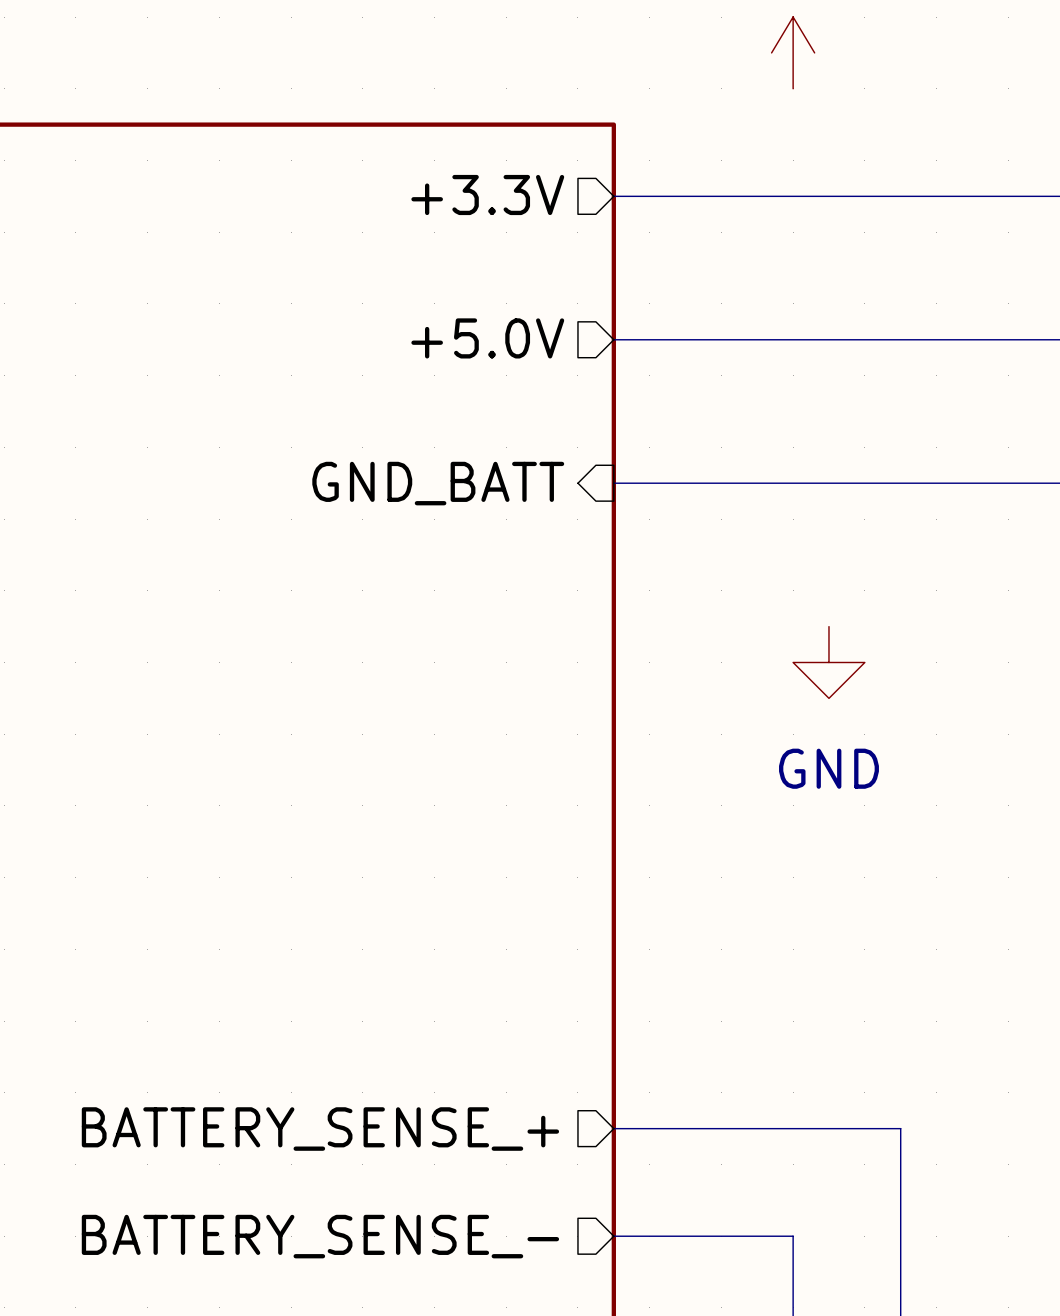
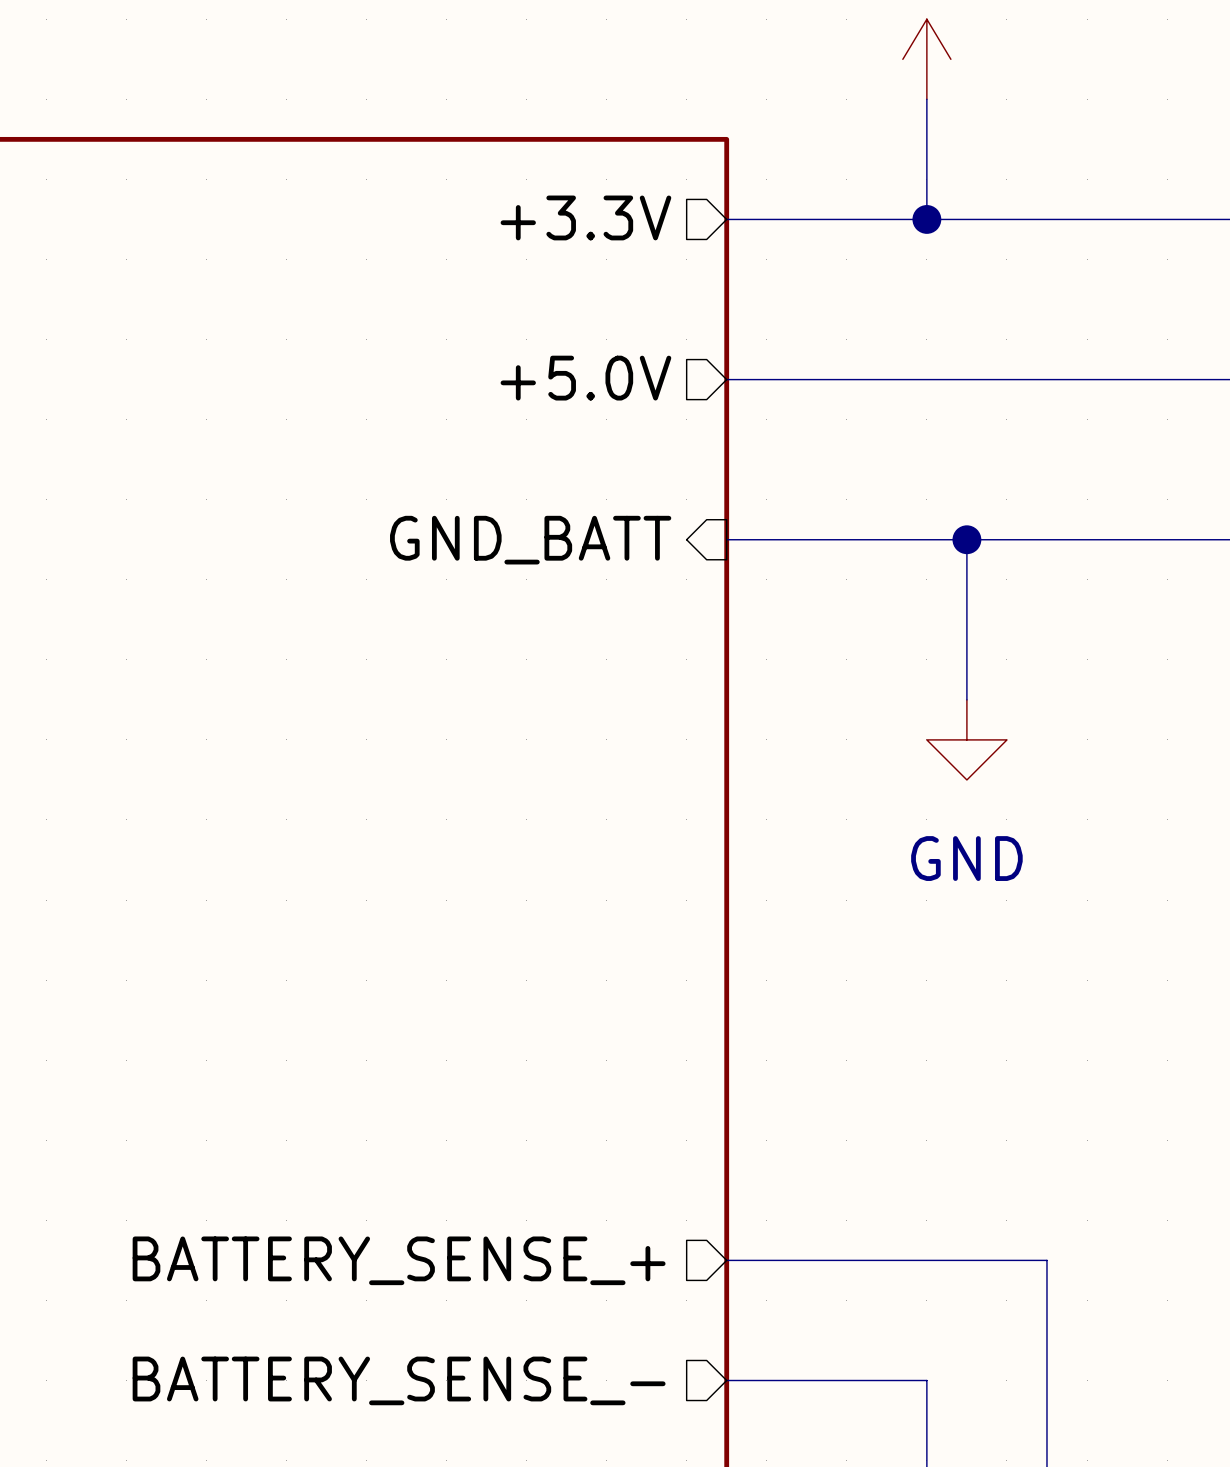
wire: none -> (926, 99) (926, 219)
junction: none -> (926, 219)
wire: none -> (966, 539) (966, 699)
junction: none -> (966, 539)

